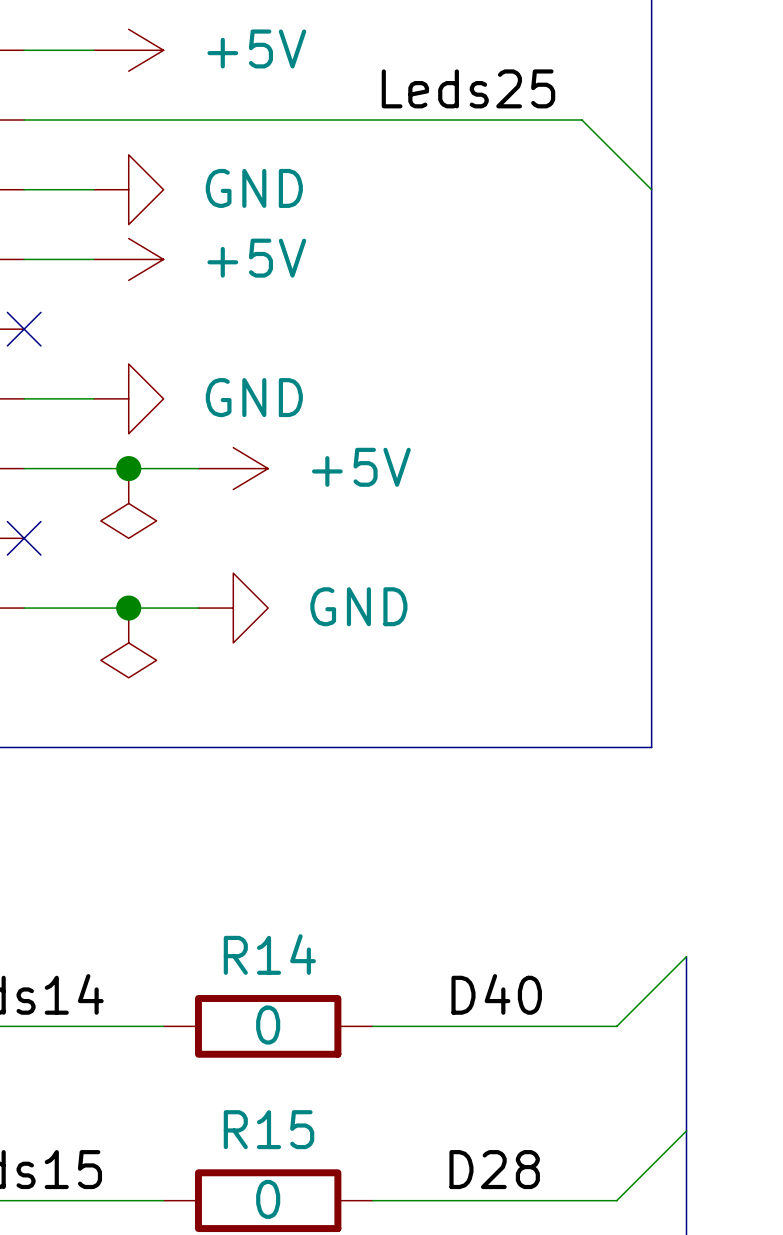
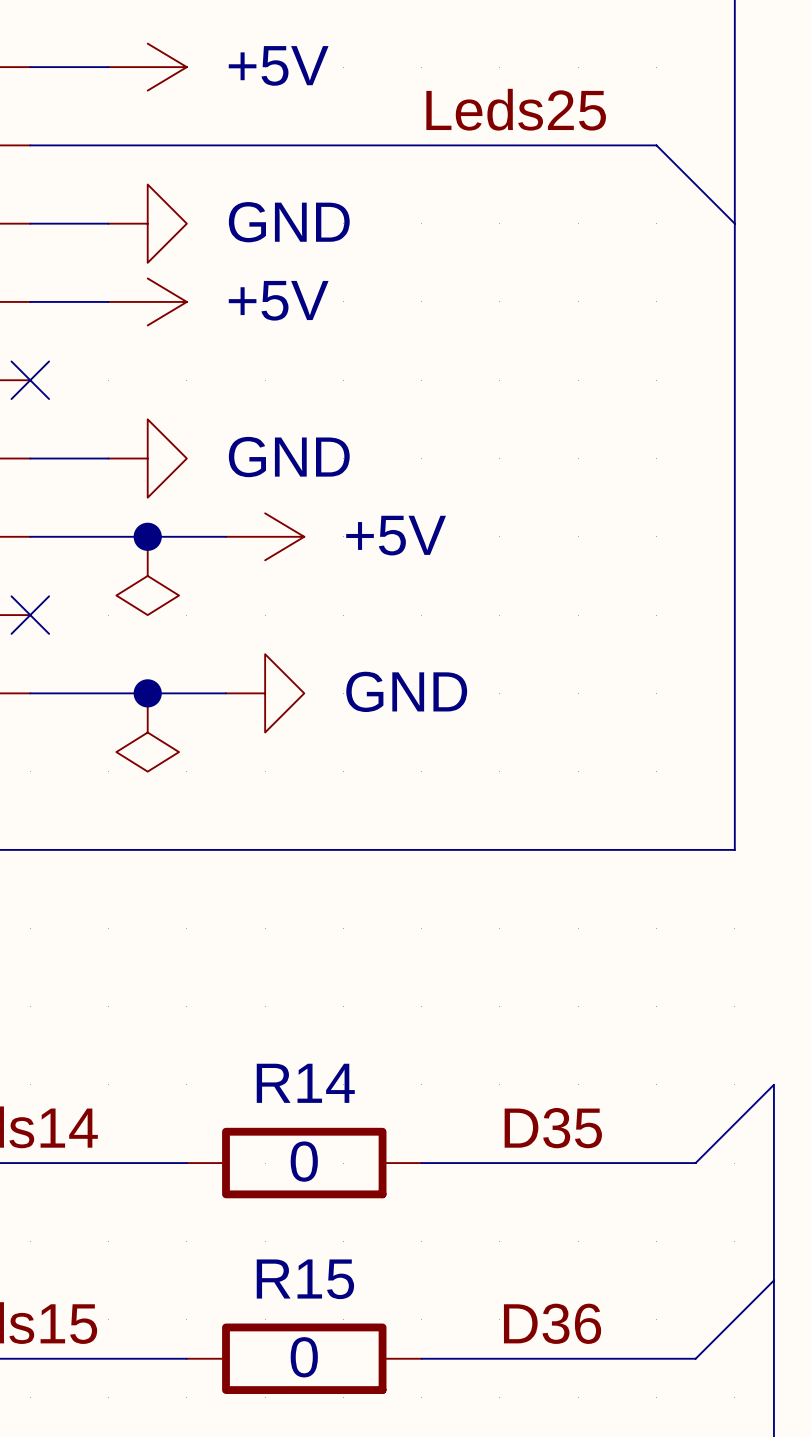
label: D40 (496, 994) -> D35 (553, 1128)
label: D28 (494, 1169) -> D36 (552, 1323)

